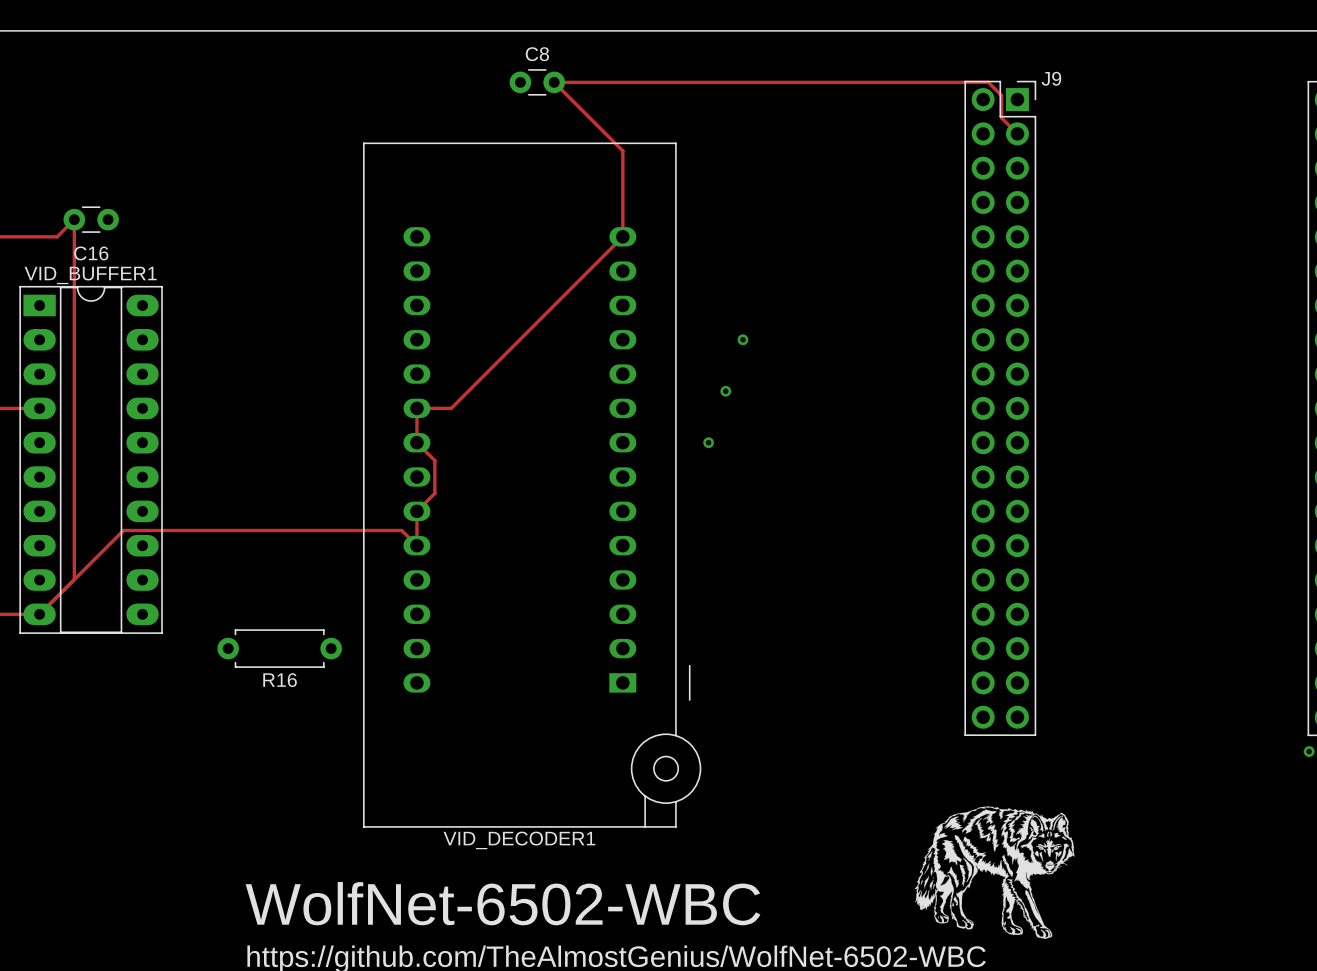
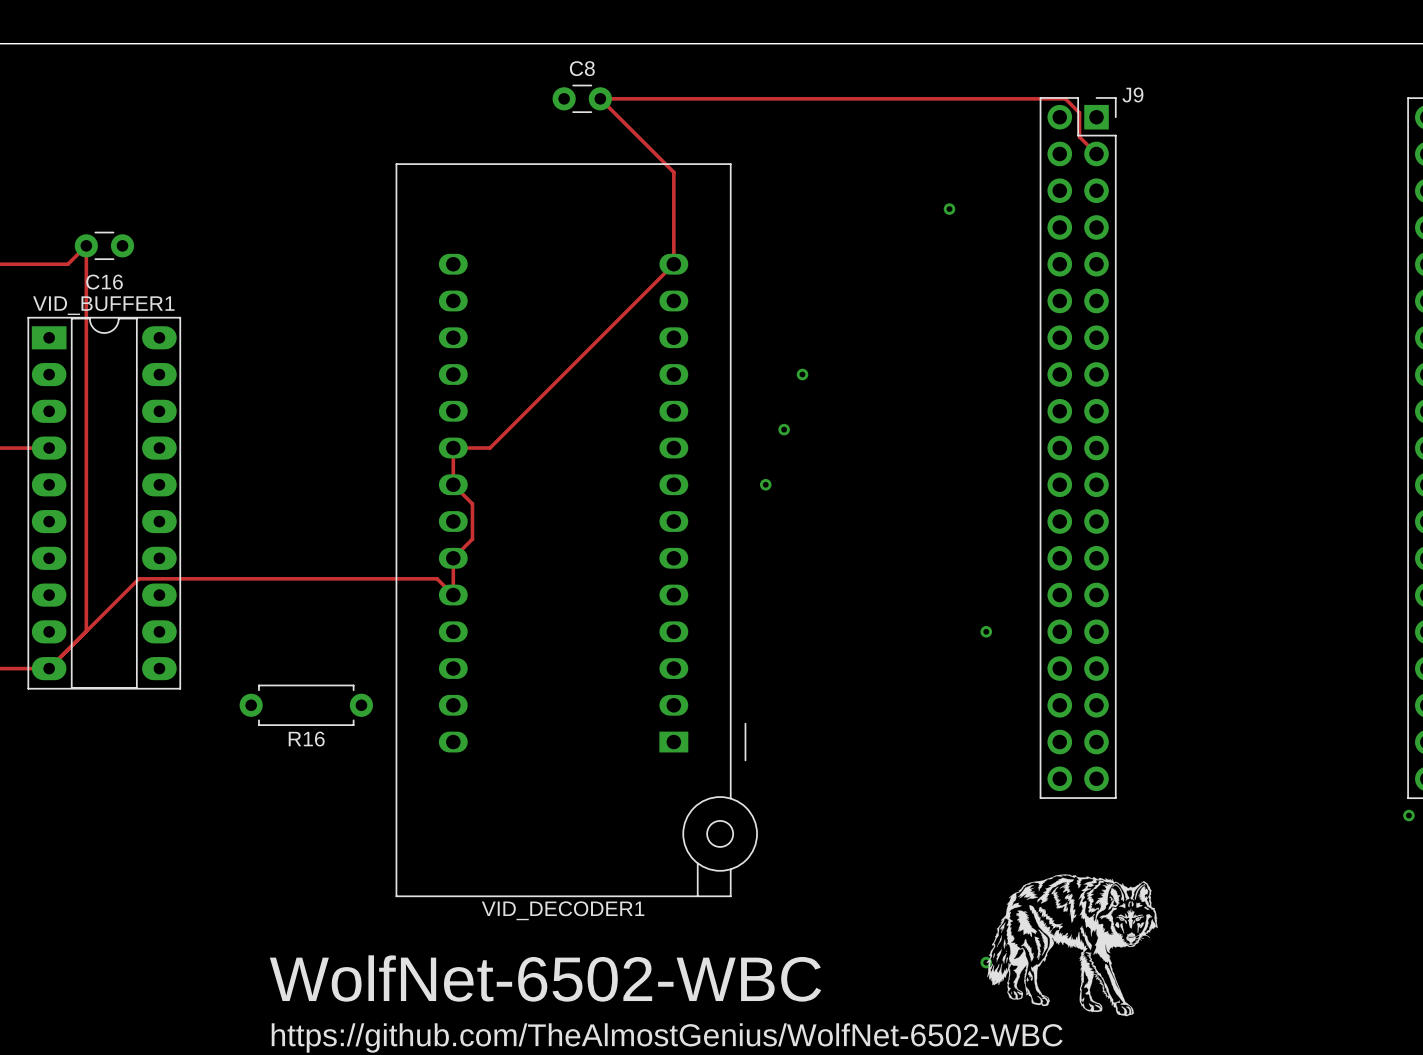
via: none -> (949, 209)
via: none -> (986, 631)
via: none -> (986, 962)

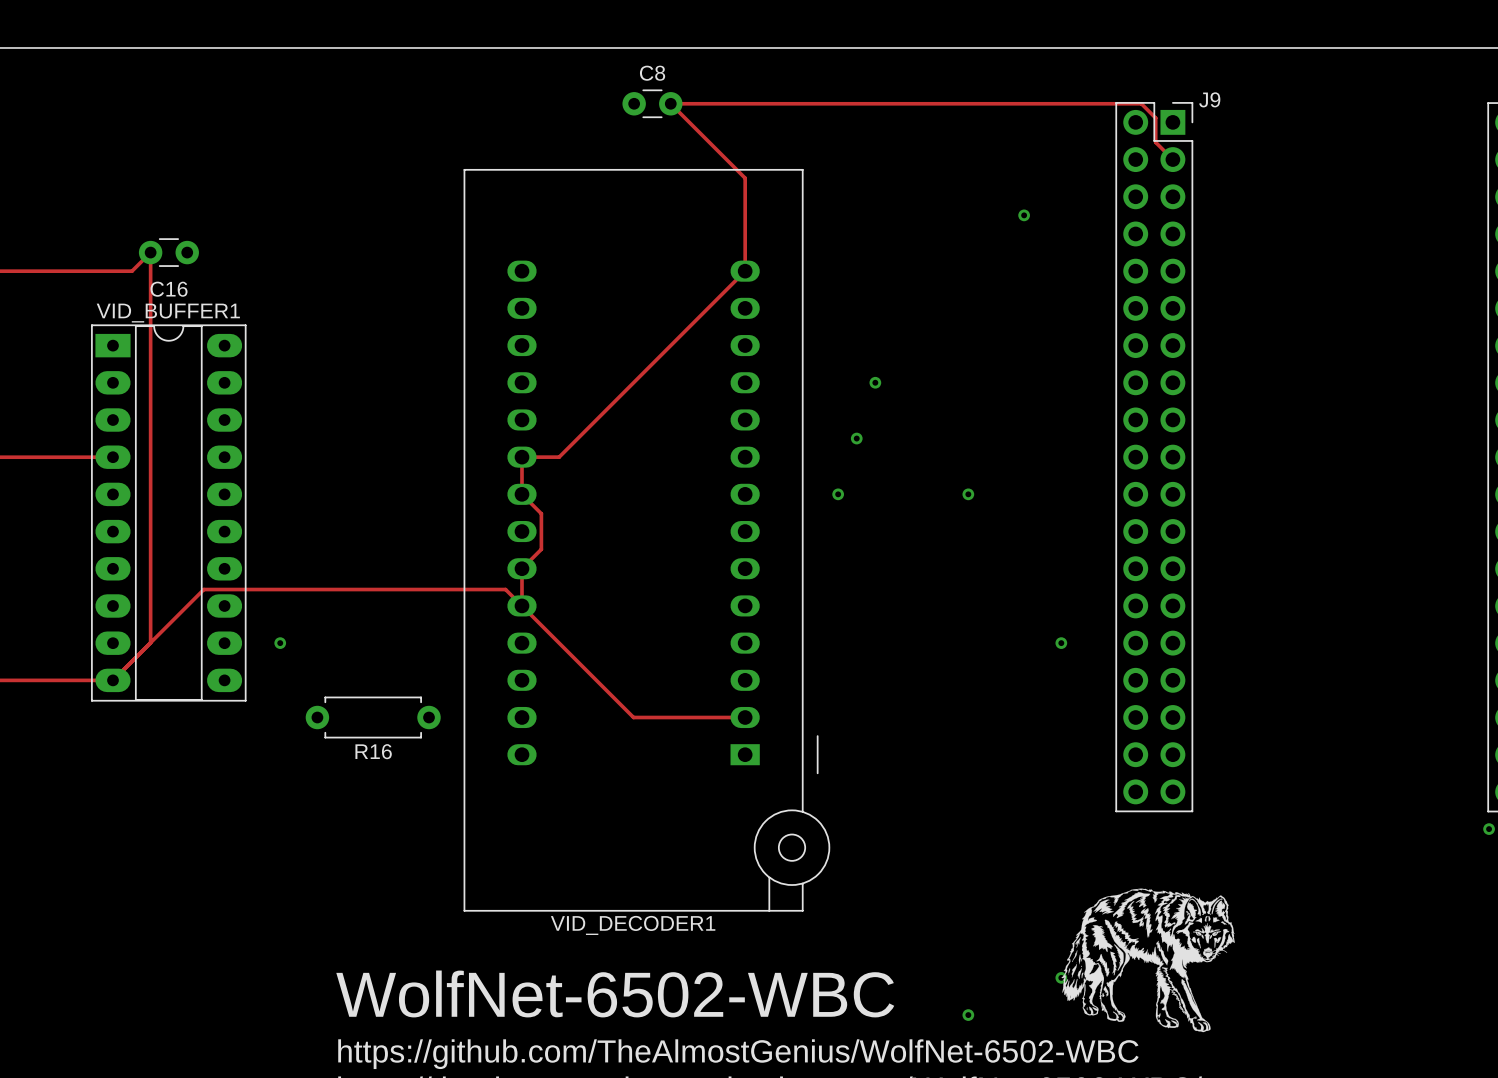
via: none -> (968, 494)
top track: none -> (521, 605) (633, 717) (745, 717)
via: none -> (280, 643)
via: none -> (968, 1015)

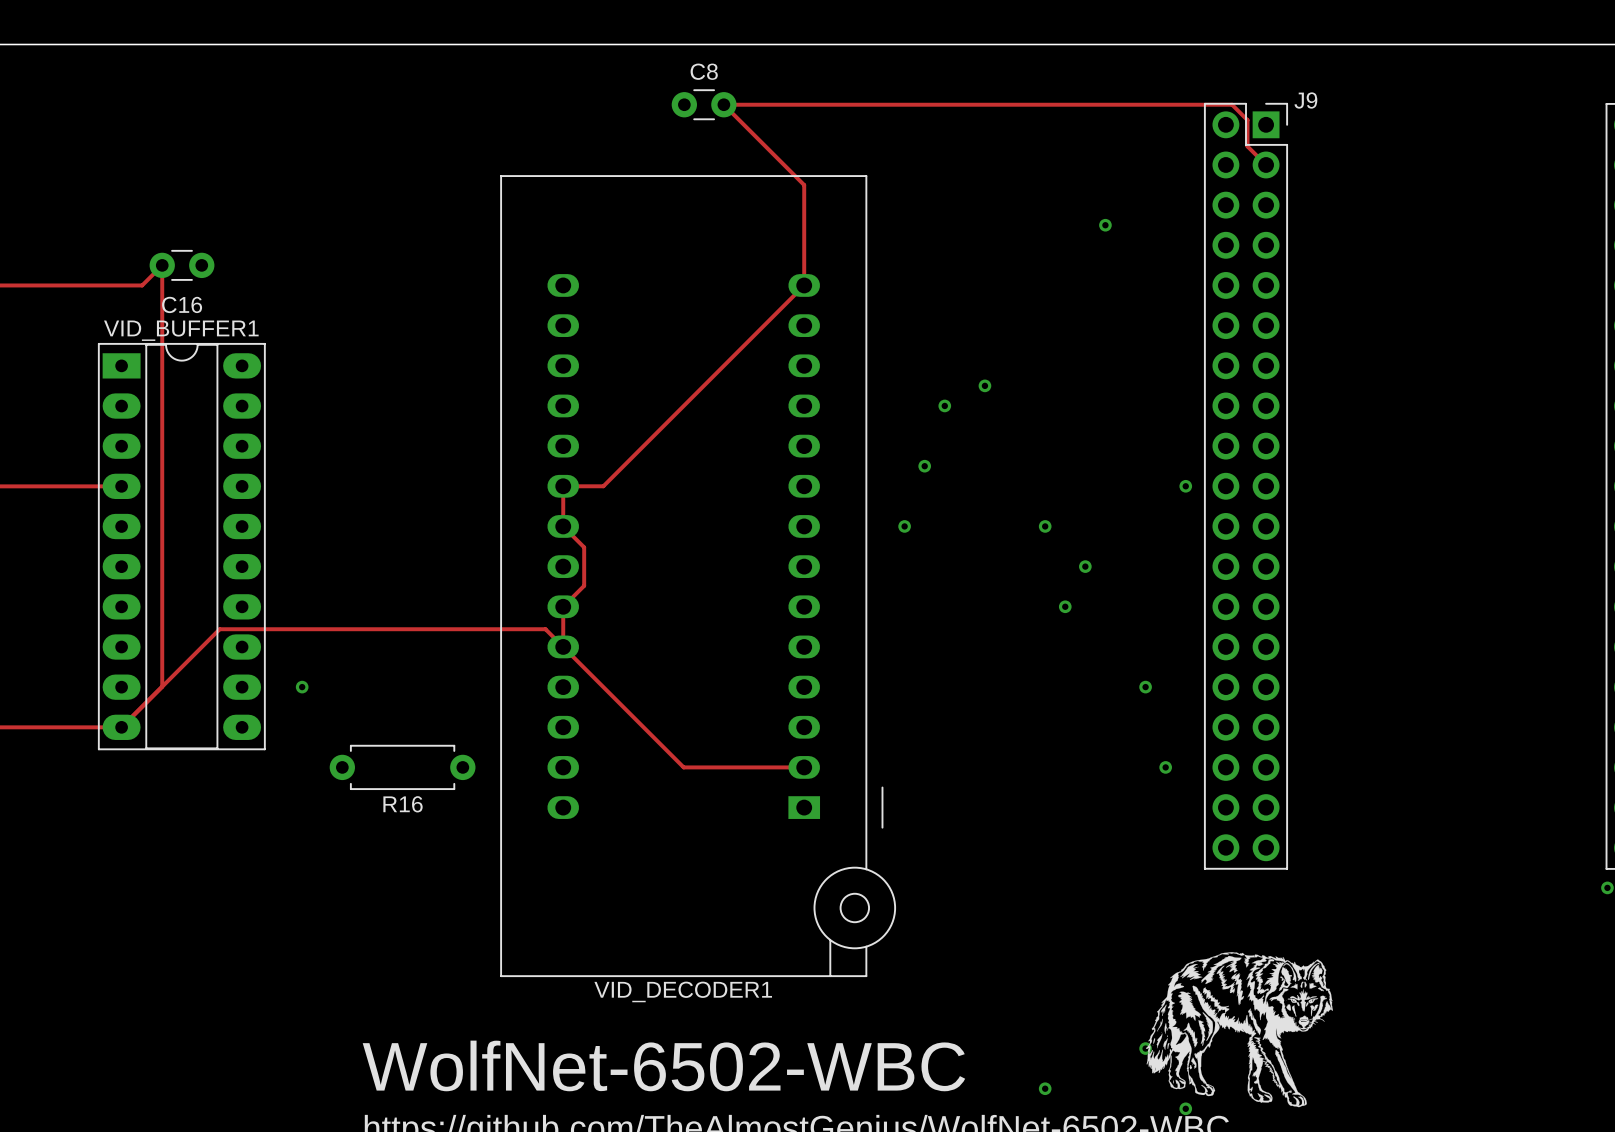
via: none -> (984, 385)
via: none -> (1185, 486)
via: none -> (1085, 566)
via: none -> (1065, 606)
via: none -> (1165, 767)
via: none -> (1185, 1108)

